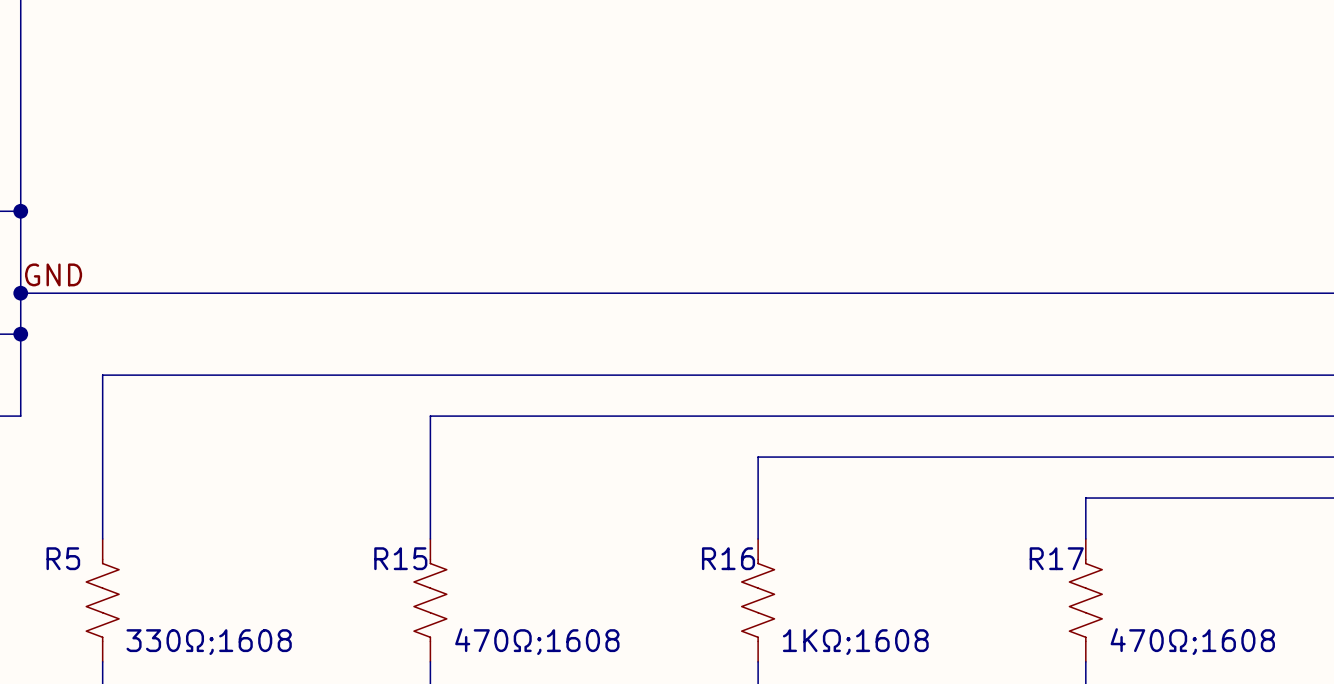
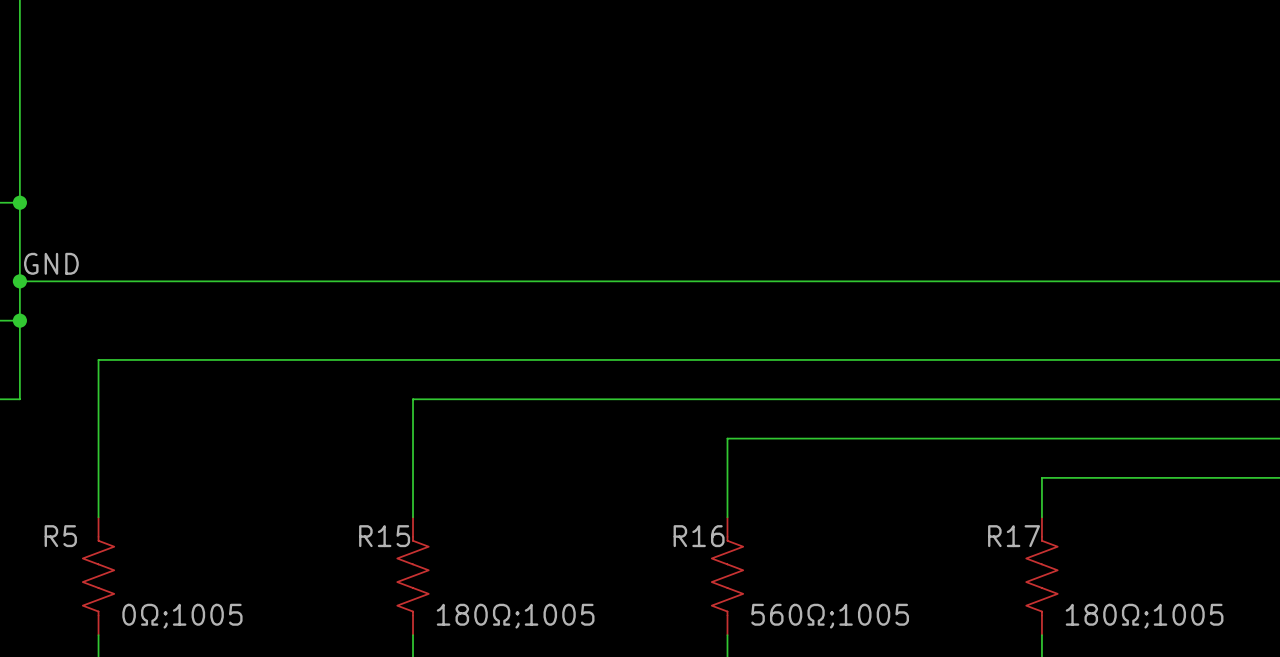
R15 value: 470Ω;1608 (537, 641) -> 180Ω;1005 (515, 616)
R17 value: 470Ω;1608 (1192, 641) -> 180Ω;1005 (1144, 616)
R5 value: 330Ω;1608 (209, 642) -> 0Ω;1005 (182, 616)
R16 value: 1KΩ;1608 (855, 642) -> 560Ω;1005 (830, 616)

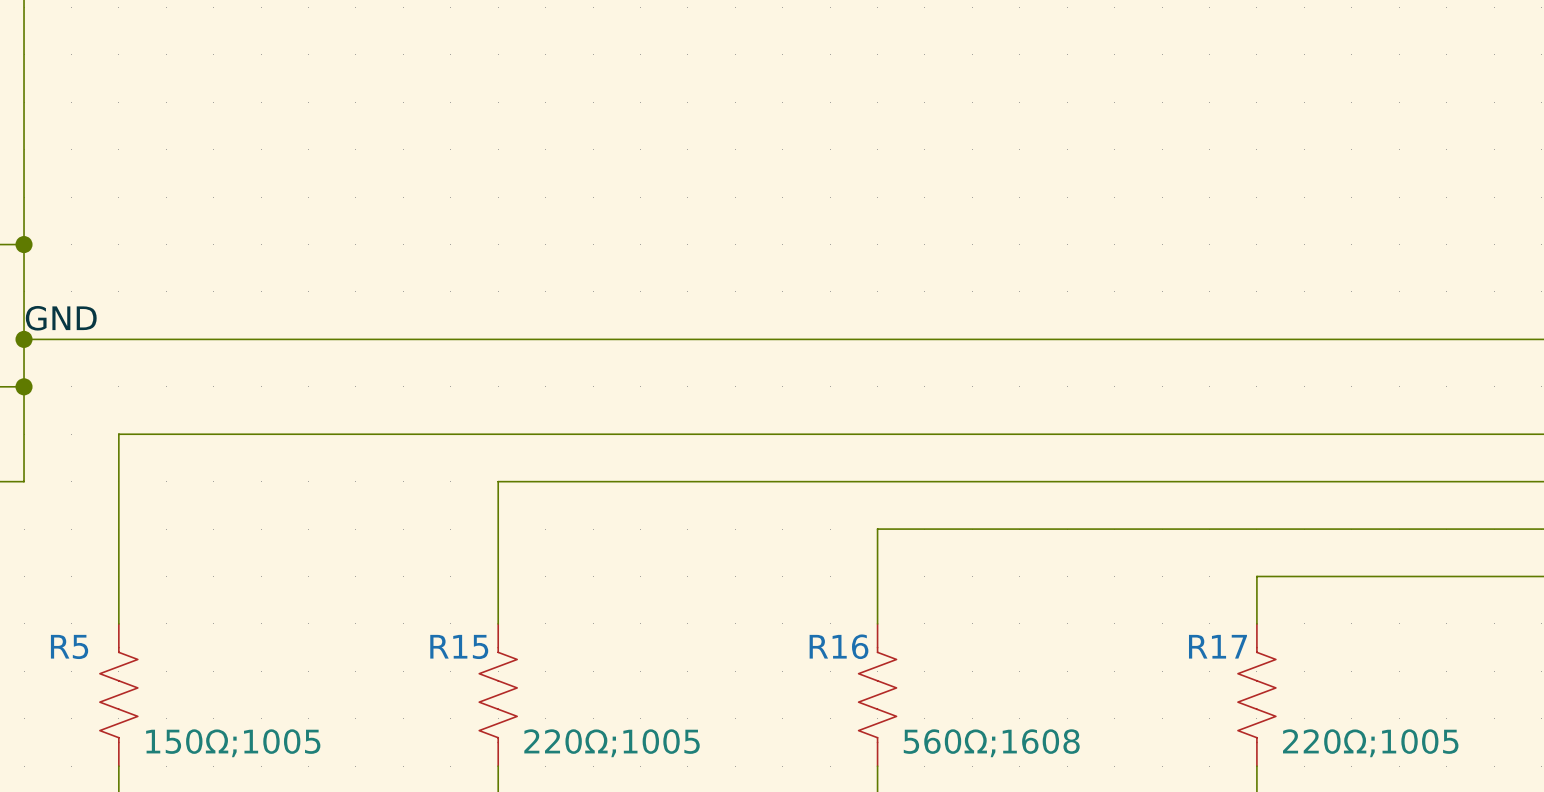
R5 value: 0Ω;1005 (182, 616) -> 150Ω;1005 (233, 743)
R15 value: 180Ω;1005 (515, 616) -> 220Ω;1005 (612, 743)
R16 value: 560Ω;1005 (830, 616) -> 560Ω;1608 (991, 743)
R17 value: 180Ω;1005 (1144, 616) -> 220Ω;1005 (1370, 743)

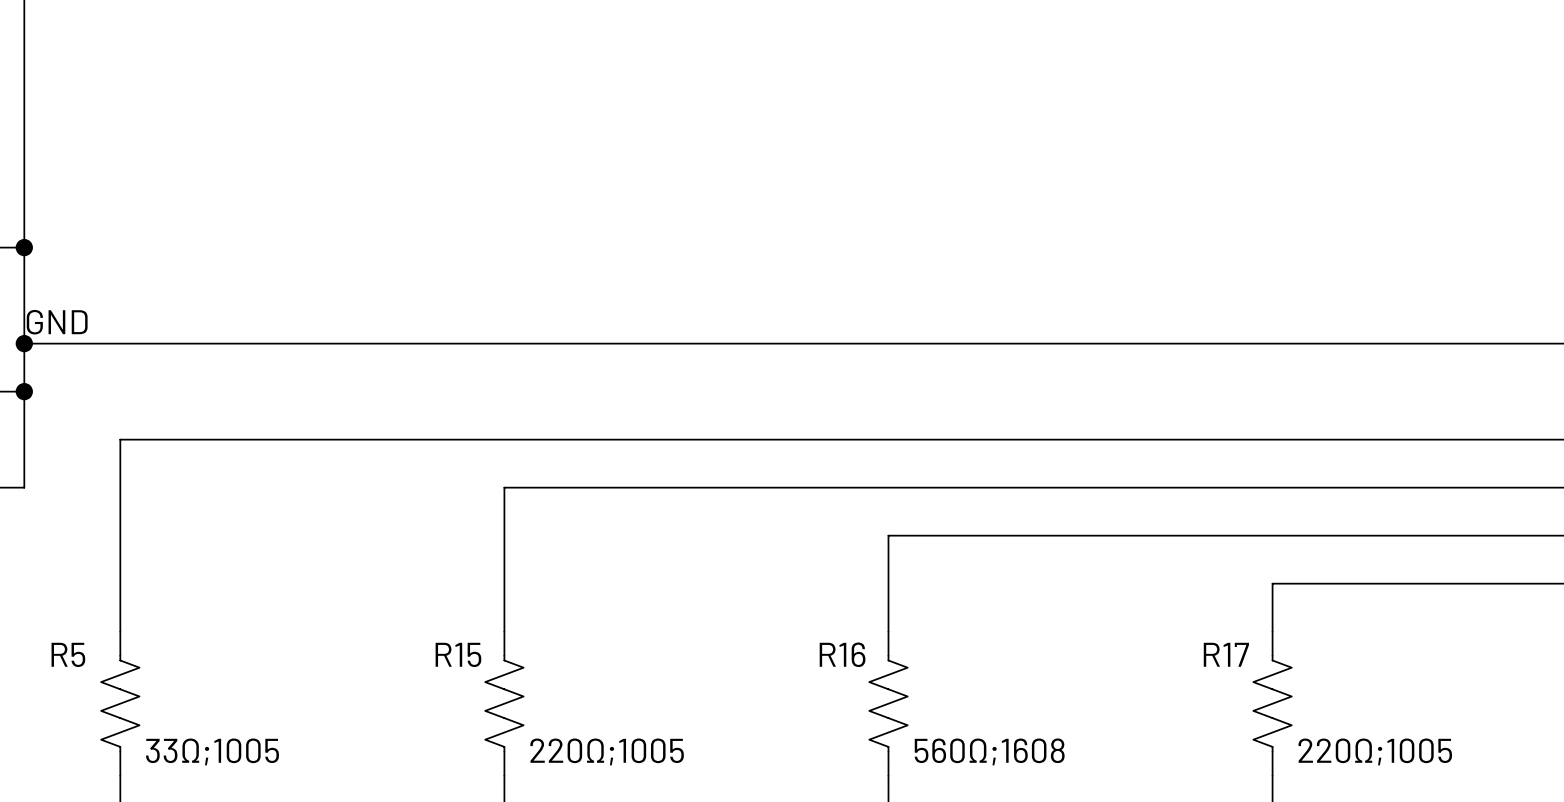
R5 value: 150Ω;1005 (233, 743) -> 33Ω;1005 (212, 751)

